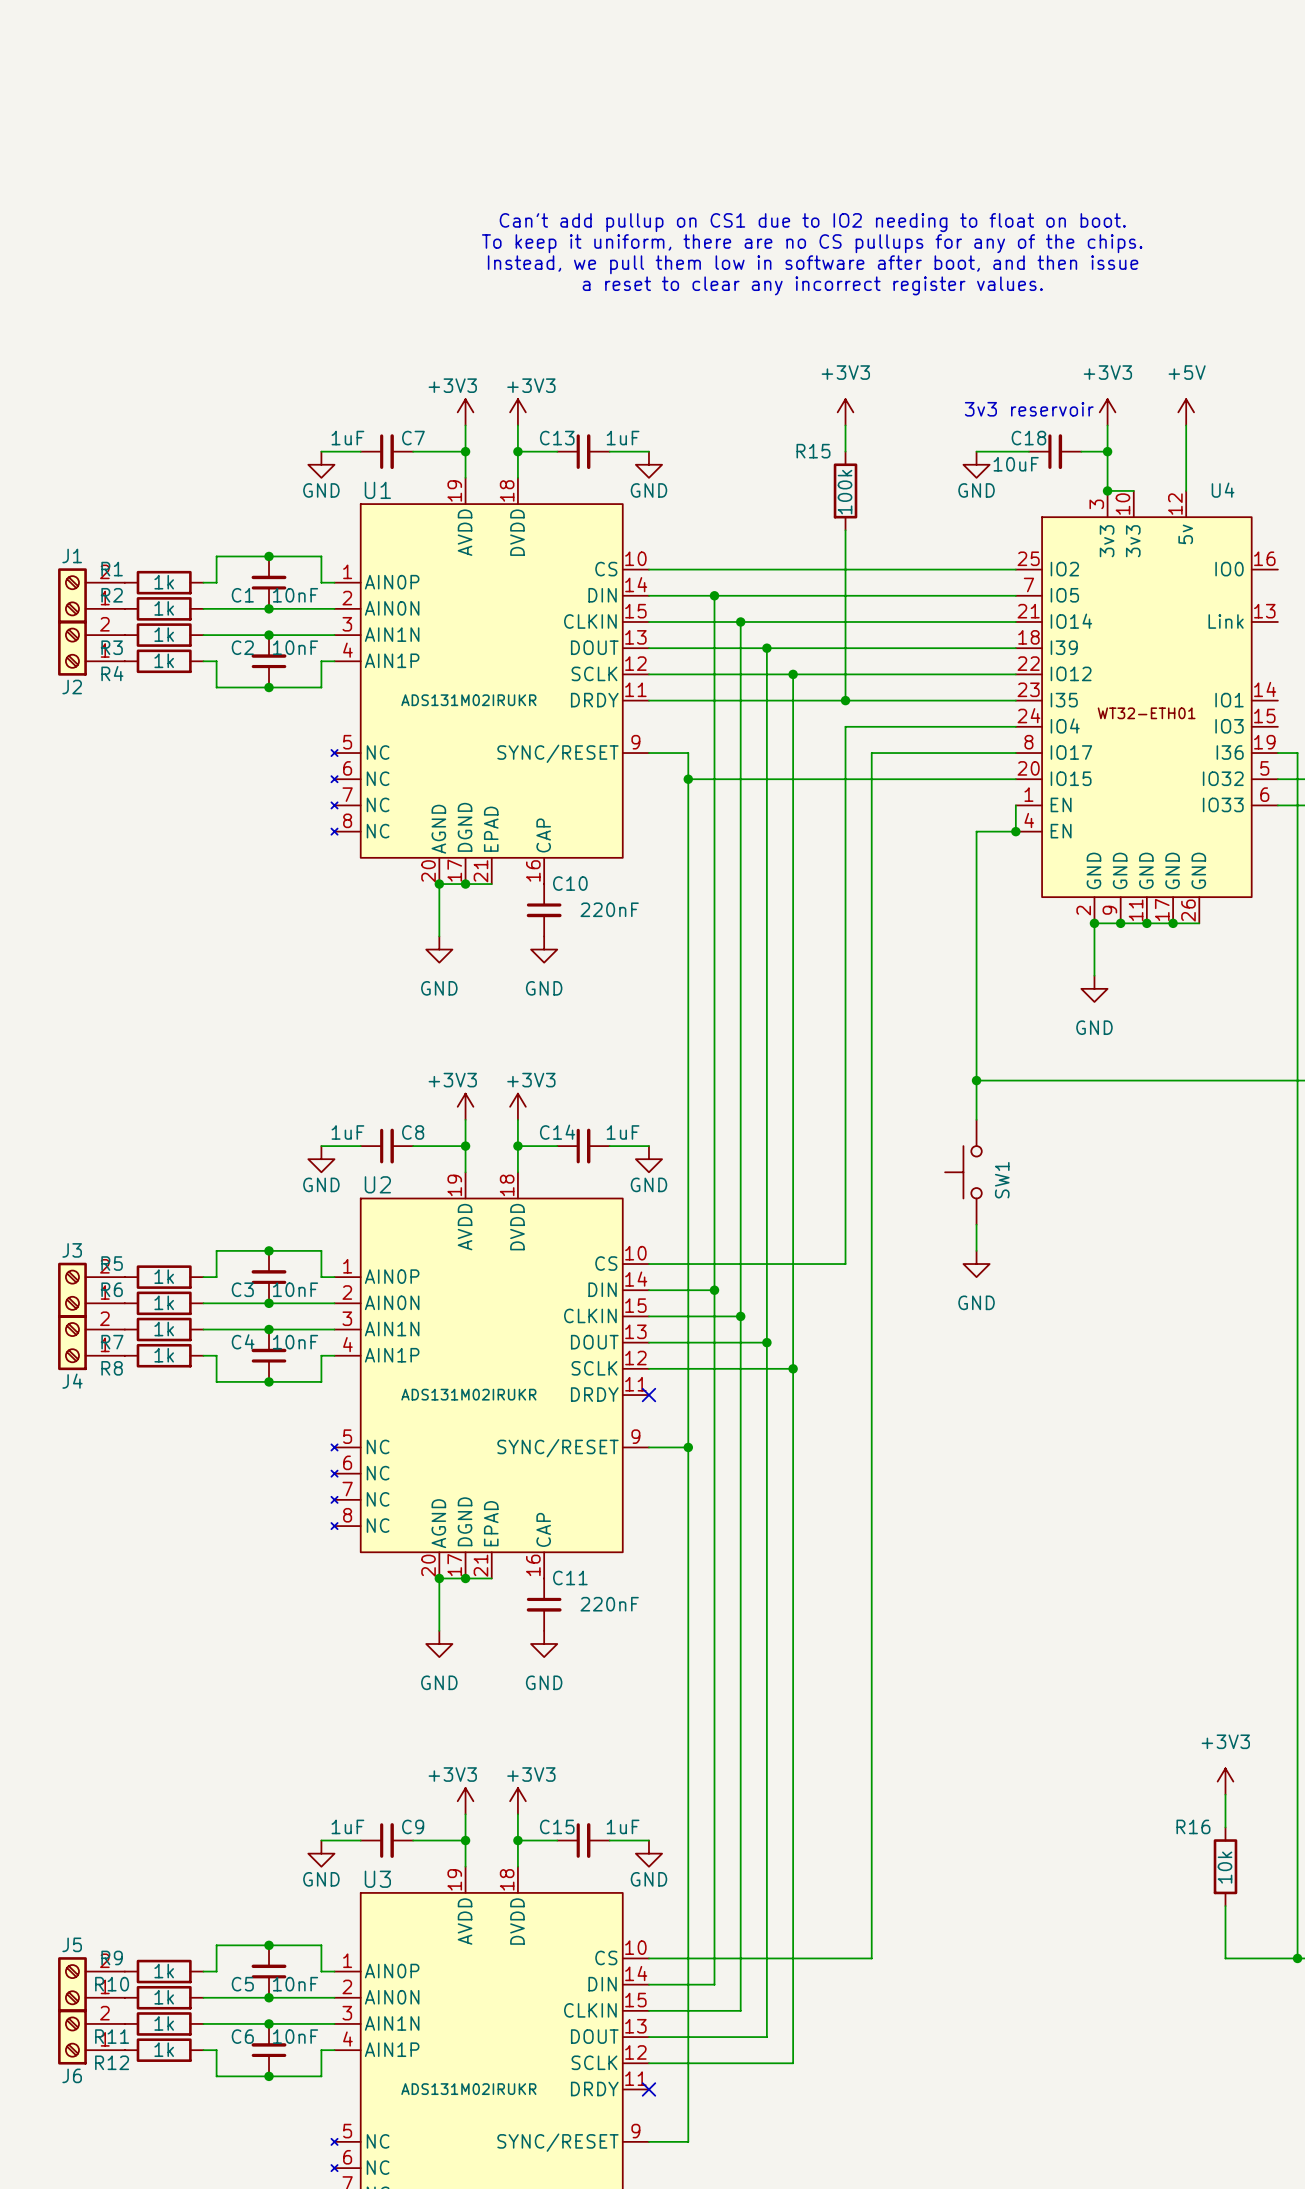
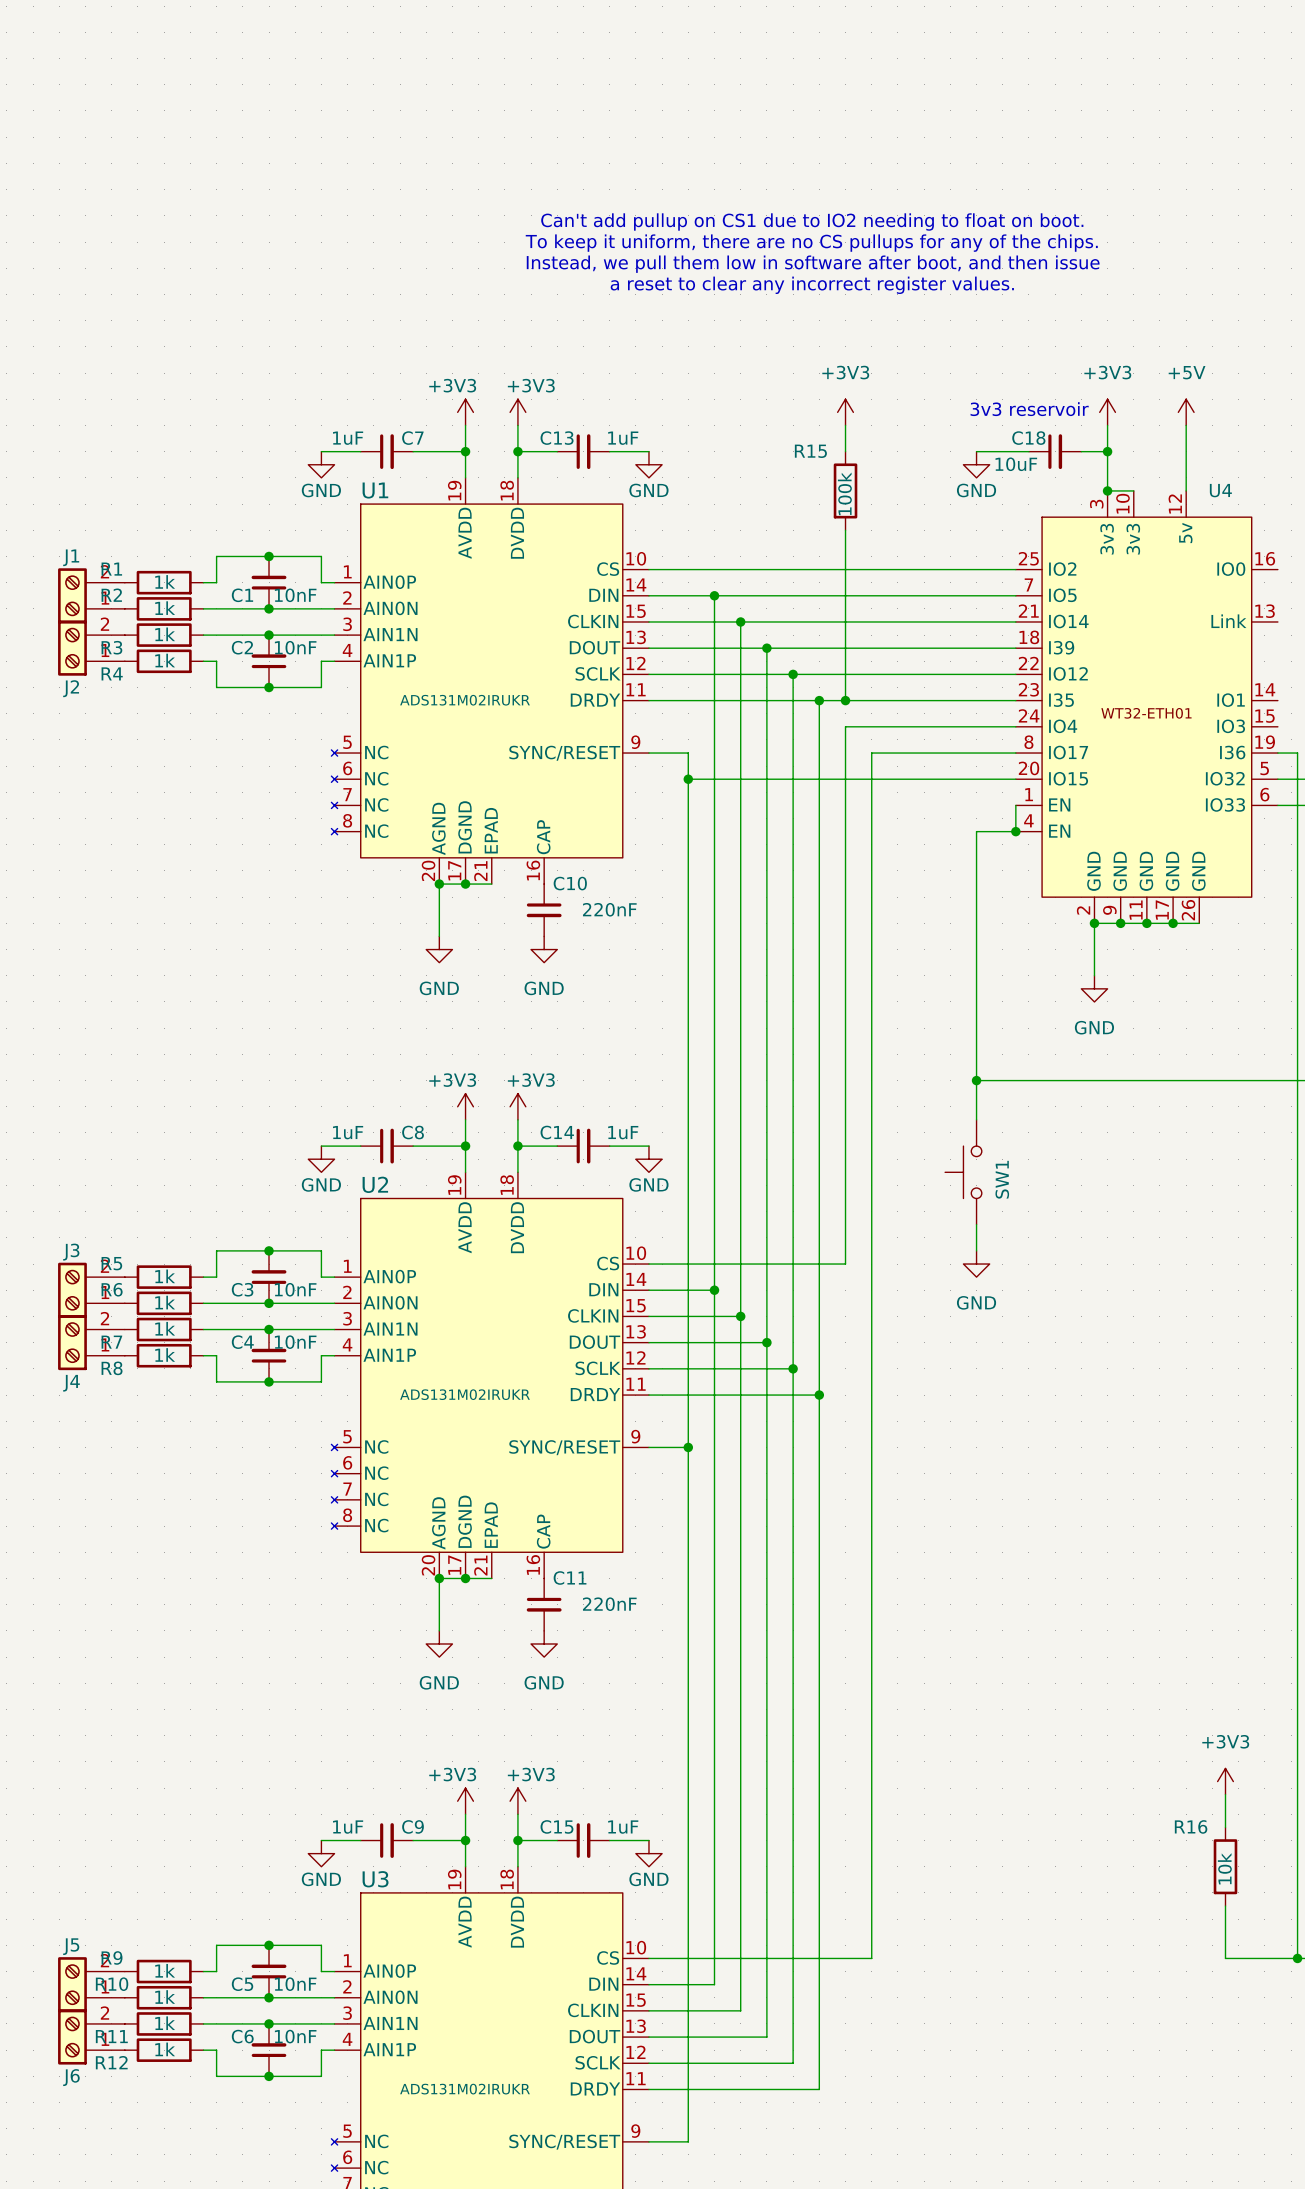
wire: none -> (819, 700) (819, 2089) (648, 2089)
junction: none -> (819, 700)
wire: none -> (648, 1395) (819, 1395)
no-connect mark: (648, 1395) -> none
junction: none -> (819, 1395)
no-connect mark: (648, 2089) -> none

